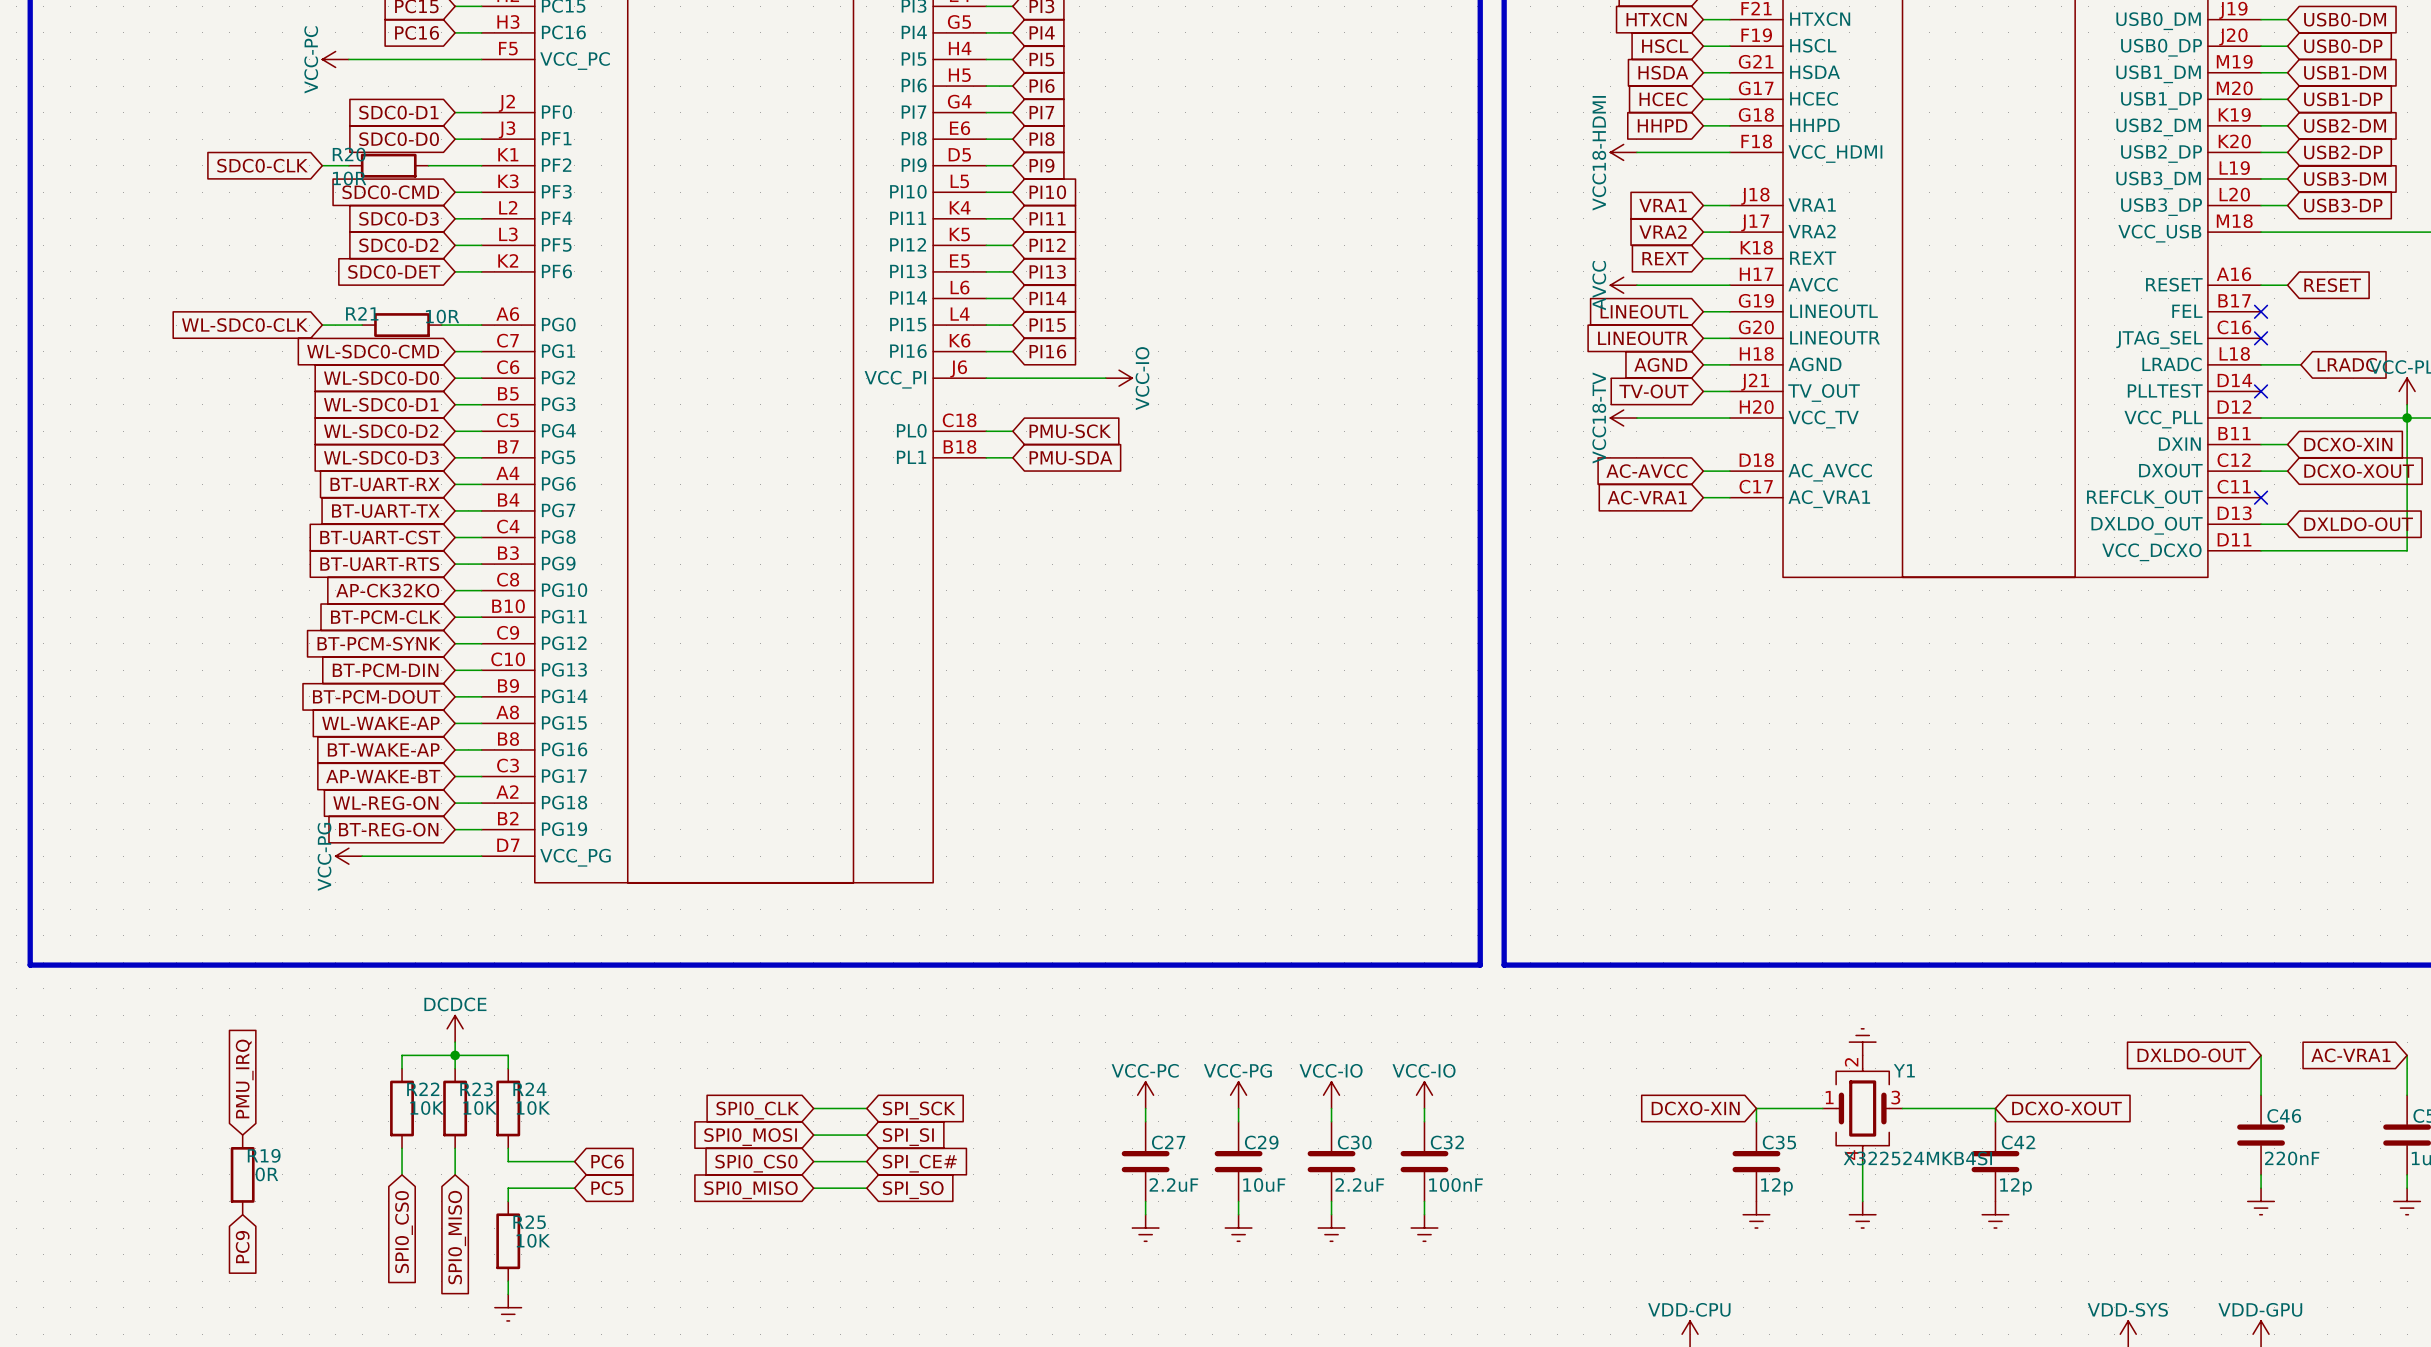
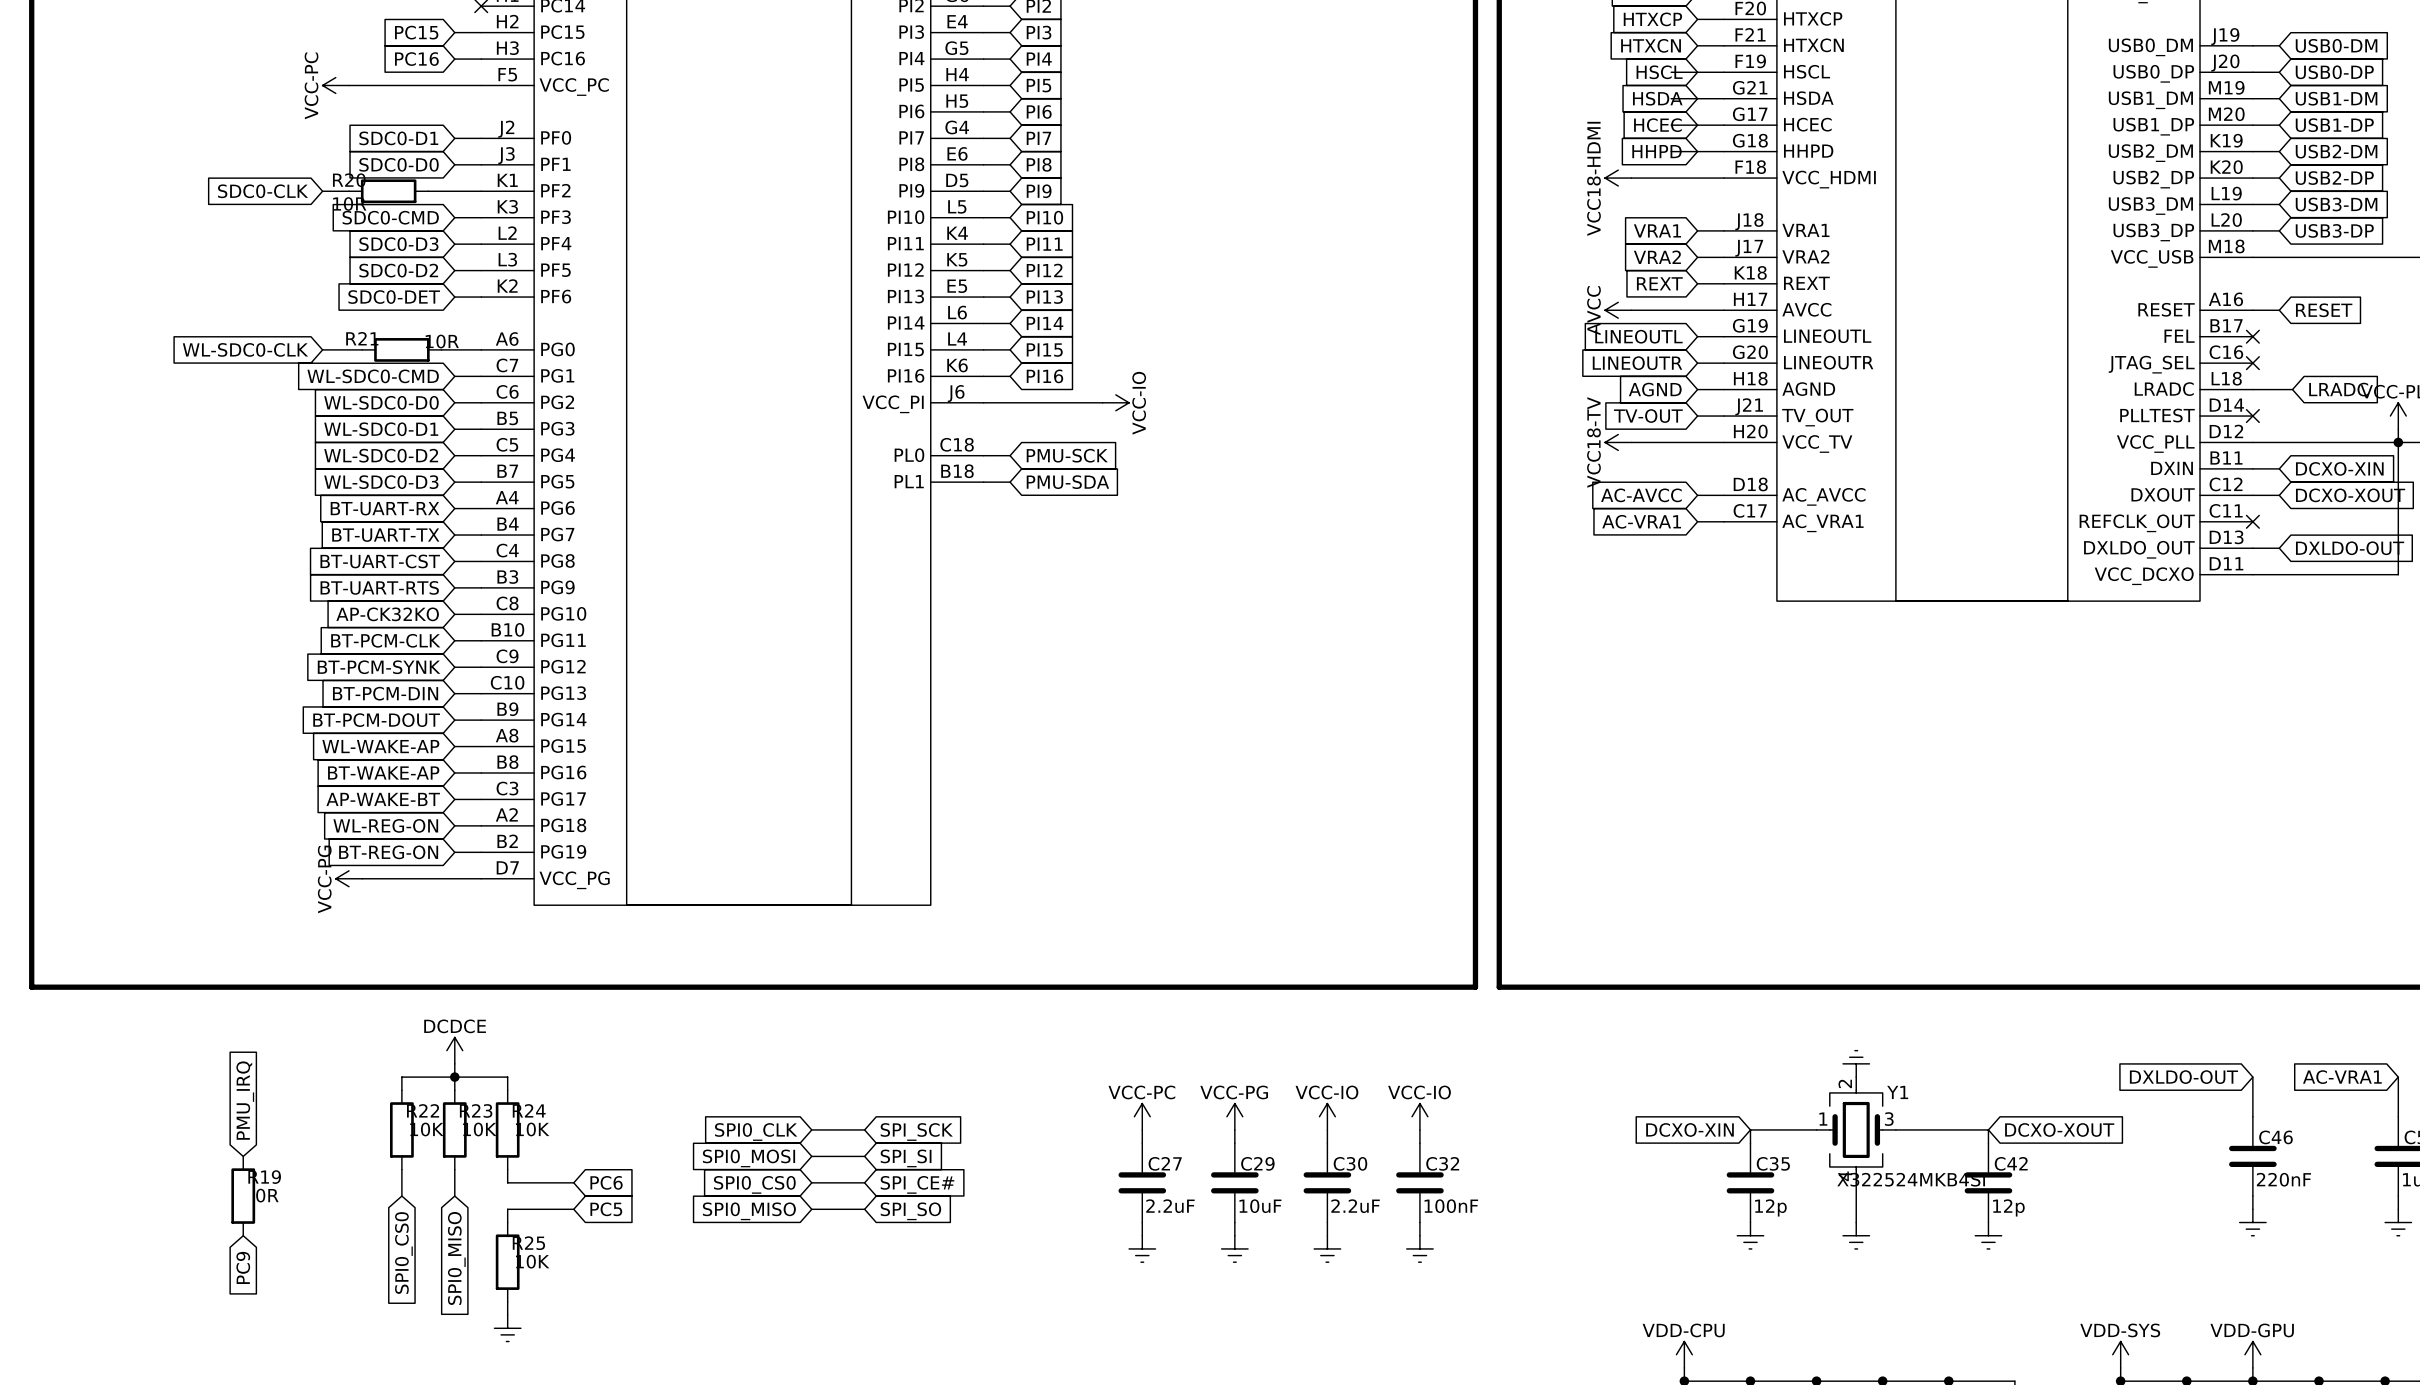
wire: none -> (1671, 72) (1697, 72)
wire: none -> (1671, 98) (1697, 98)
wire: none -> (1671, 125) (1697, 125)
wire: none -> (1671, 151) (1697, 151)

